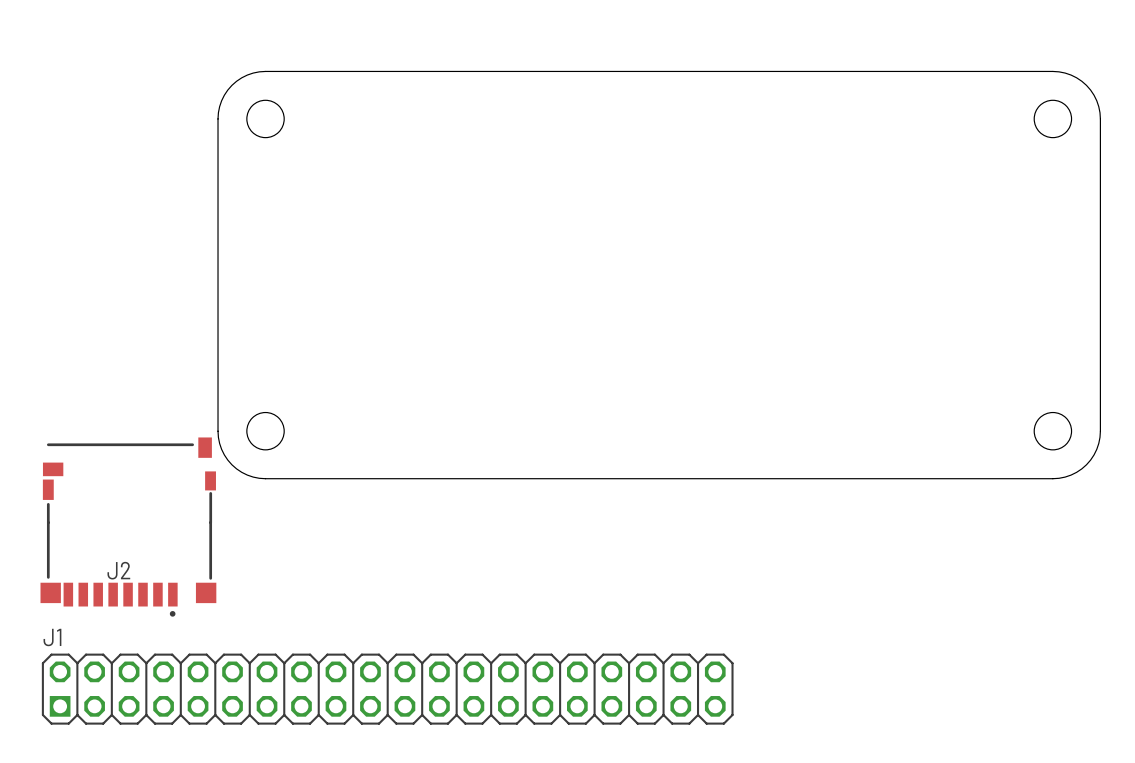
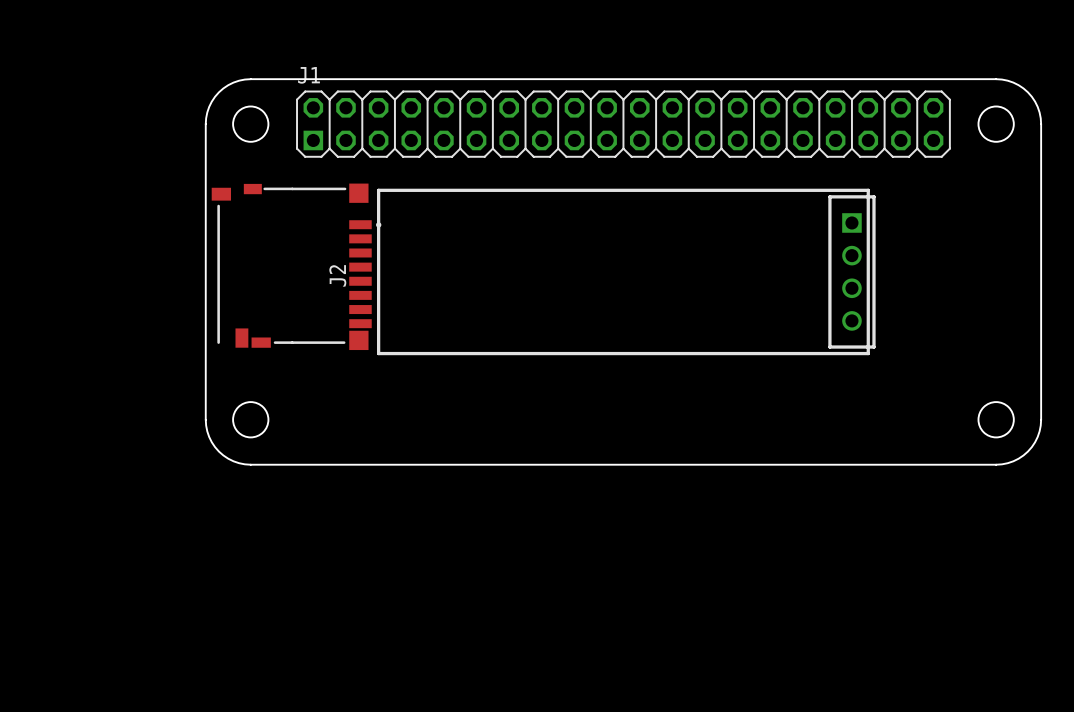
drawing: none -> [376, 188, 870, 356]
part: none -> (851, 271)
J2 rotation: 0° (128, 527) -> 90° counterclockwise (296, 266)
J2 position: (128, 527) -> (296, 266)
J1 position: (387, 689) -> (623, 124)

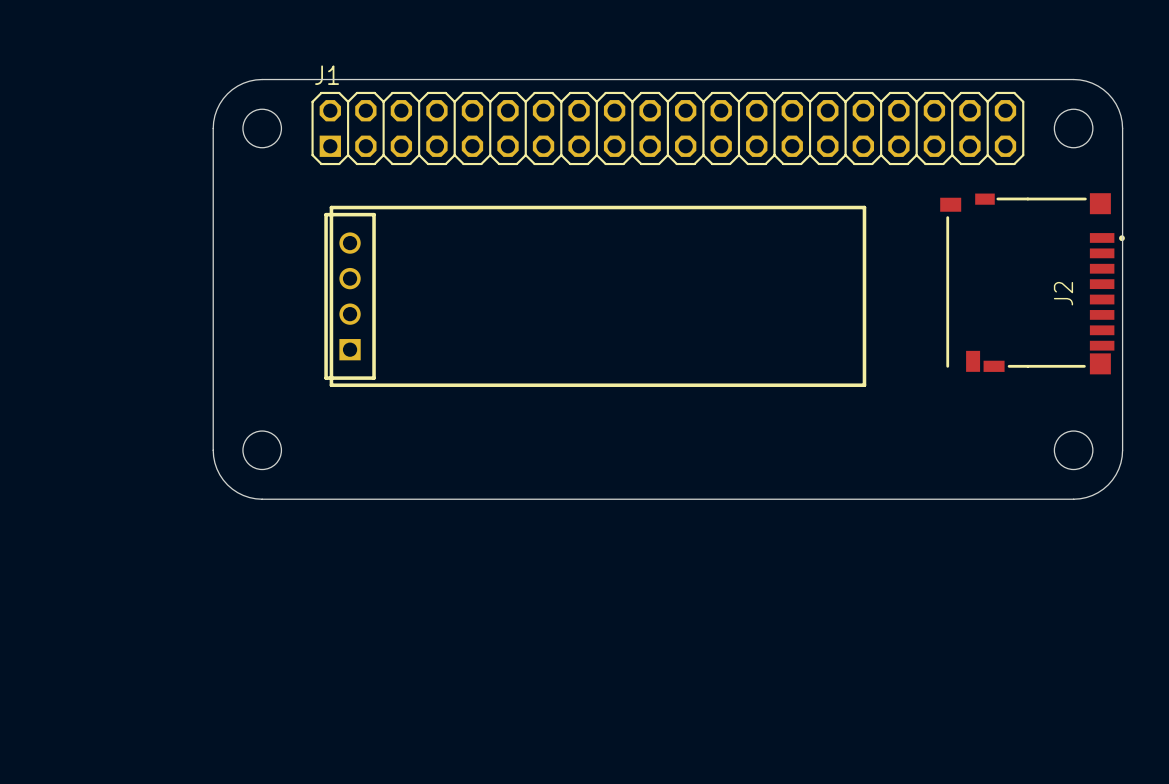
J2 position: (296, 266) -> (1032, 283)
drawing position: (623, 271) -> (597, 296)
part: (851, 271) -> none
J2 name position: J2 (337, 275) -> J2 (1063, 293)
part: none -> (350, 296)

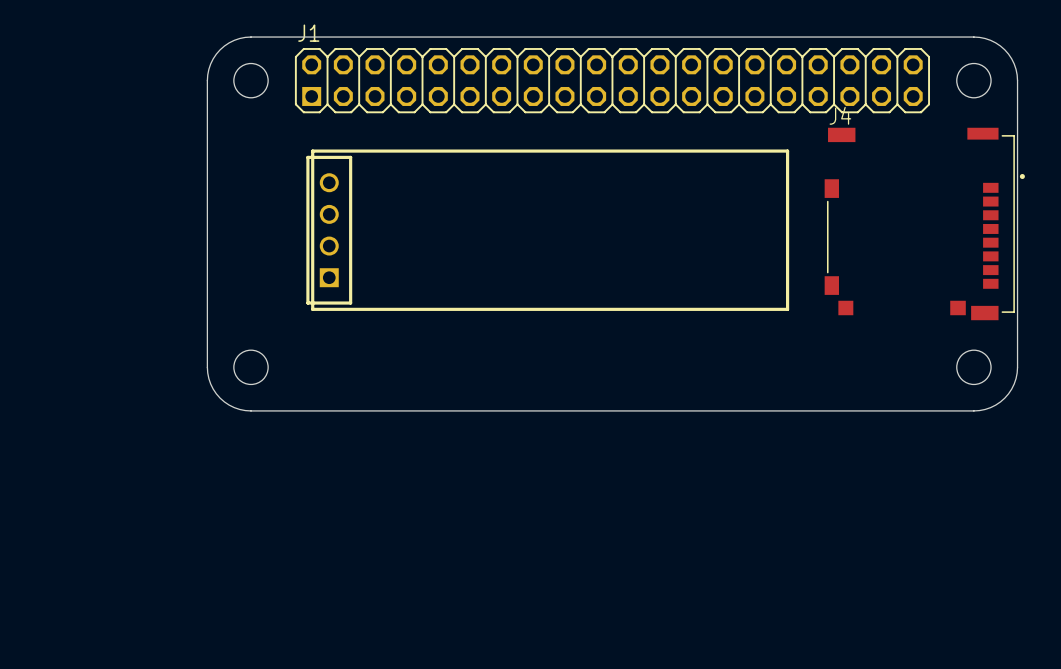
J2: (1032, 283) -> none
J4: none -> (924, 223)

